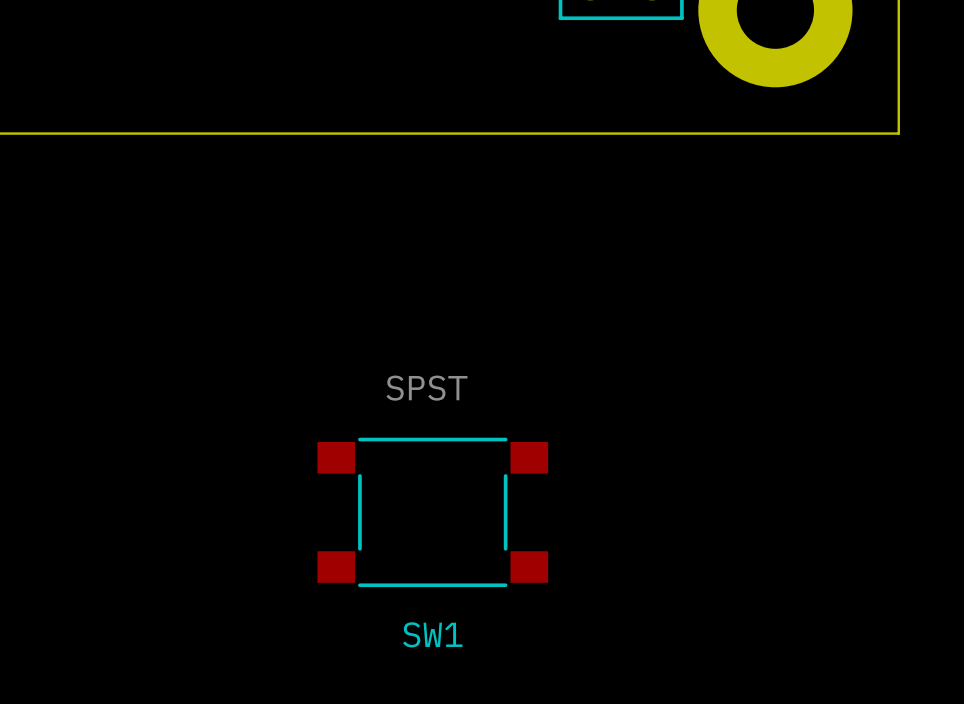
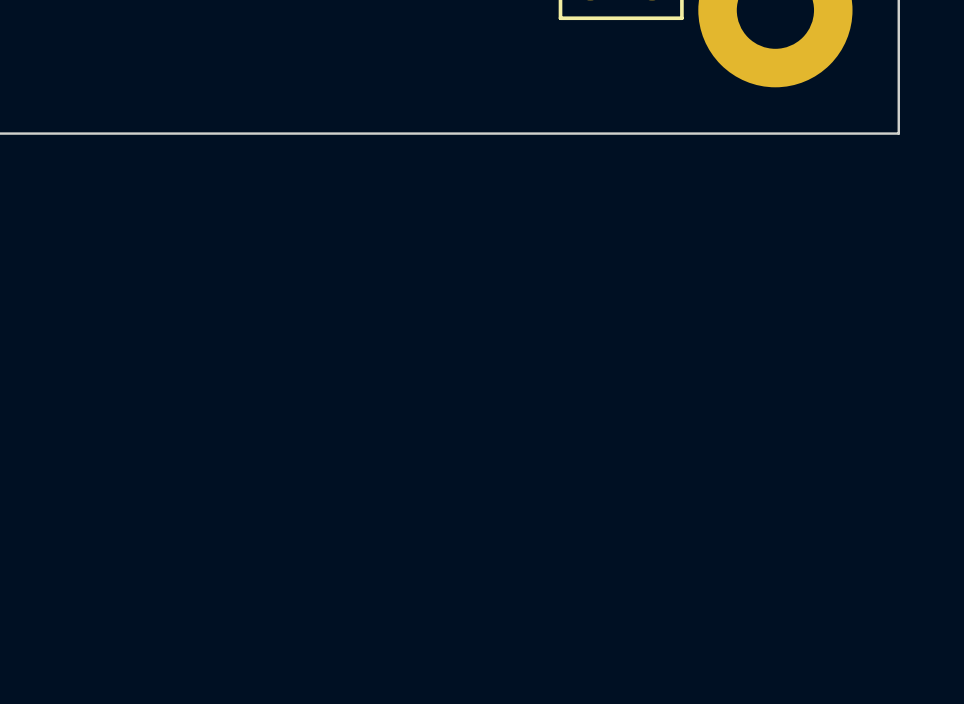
SW1: SPST (432, 512) -> none

